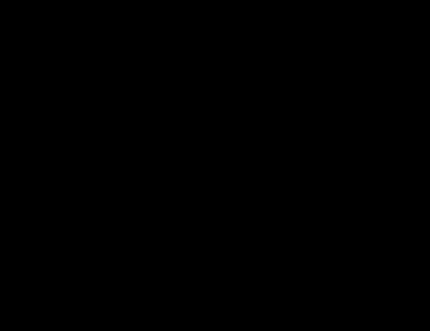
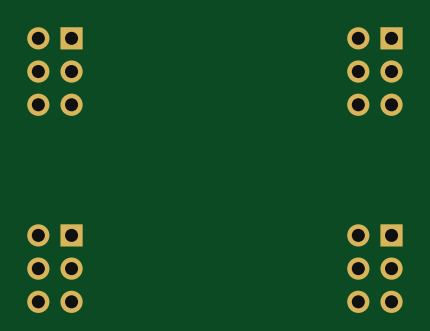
part: none -> (54, 71)
part: none -> (374, 71)
part: none -> (54, 268)
part: none -> (374, 268)

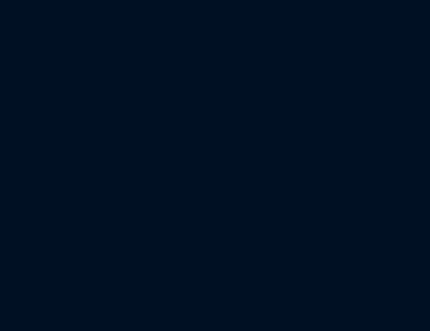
part: (54, 71) -> none
part: (374, 71) -> none
part: (54, 268) -> none
part: (374, 268) -> none

